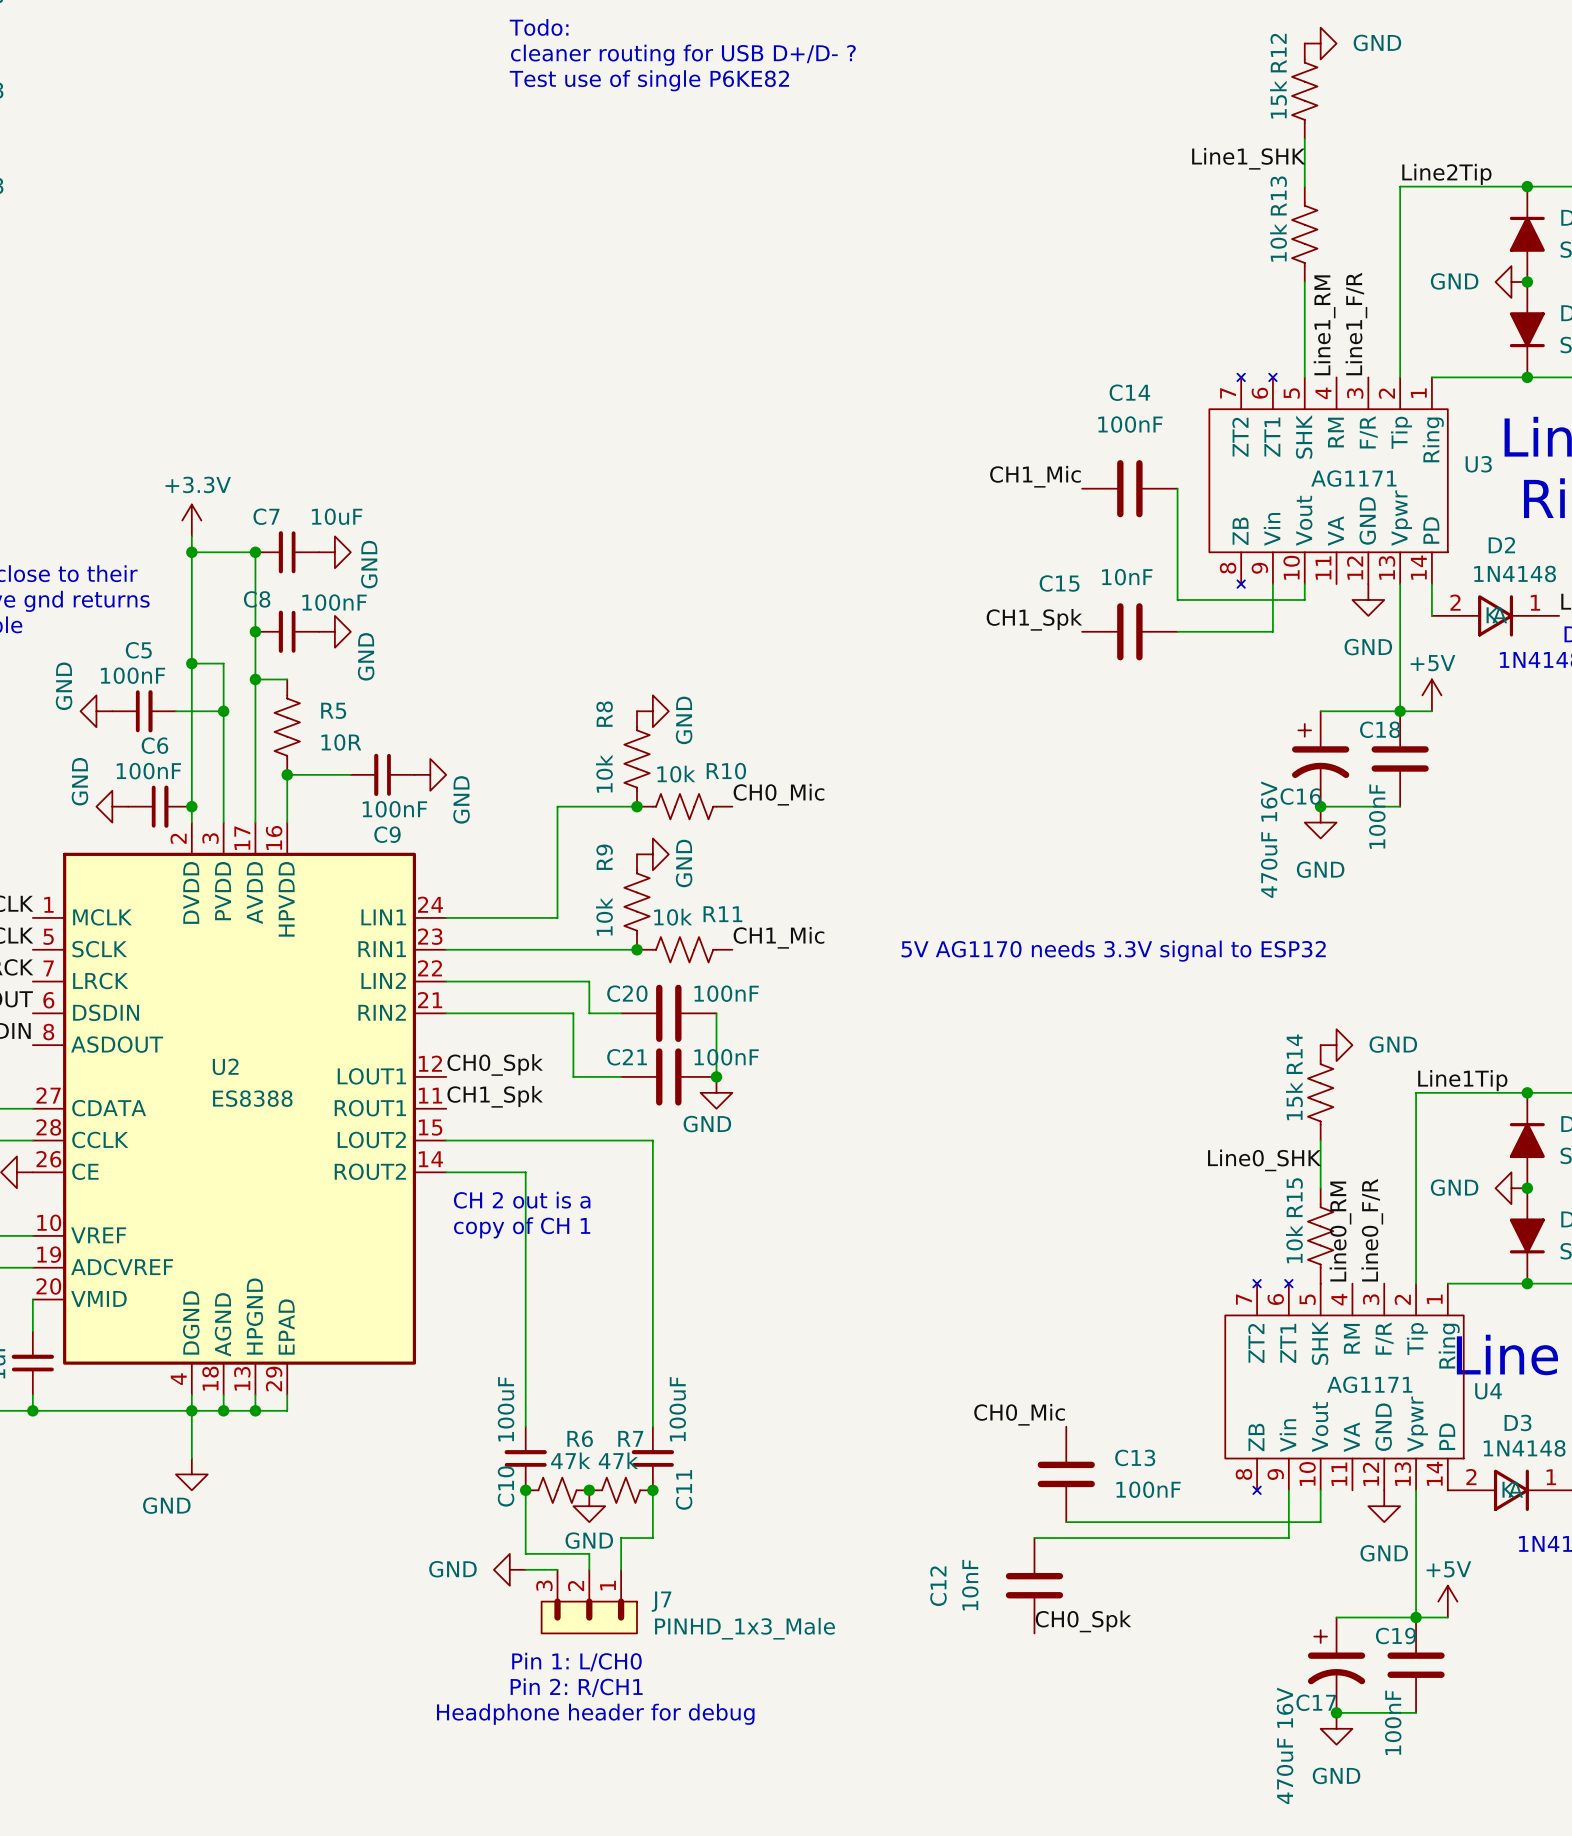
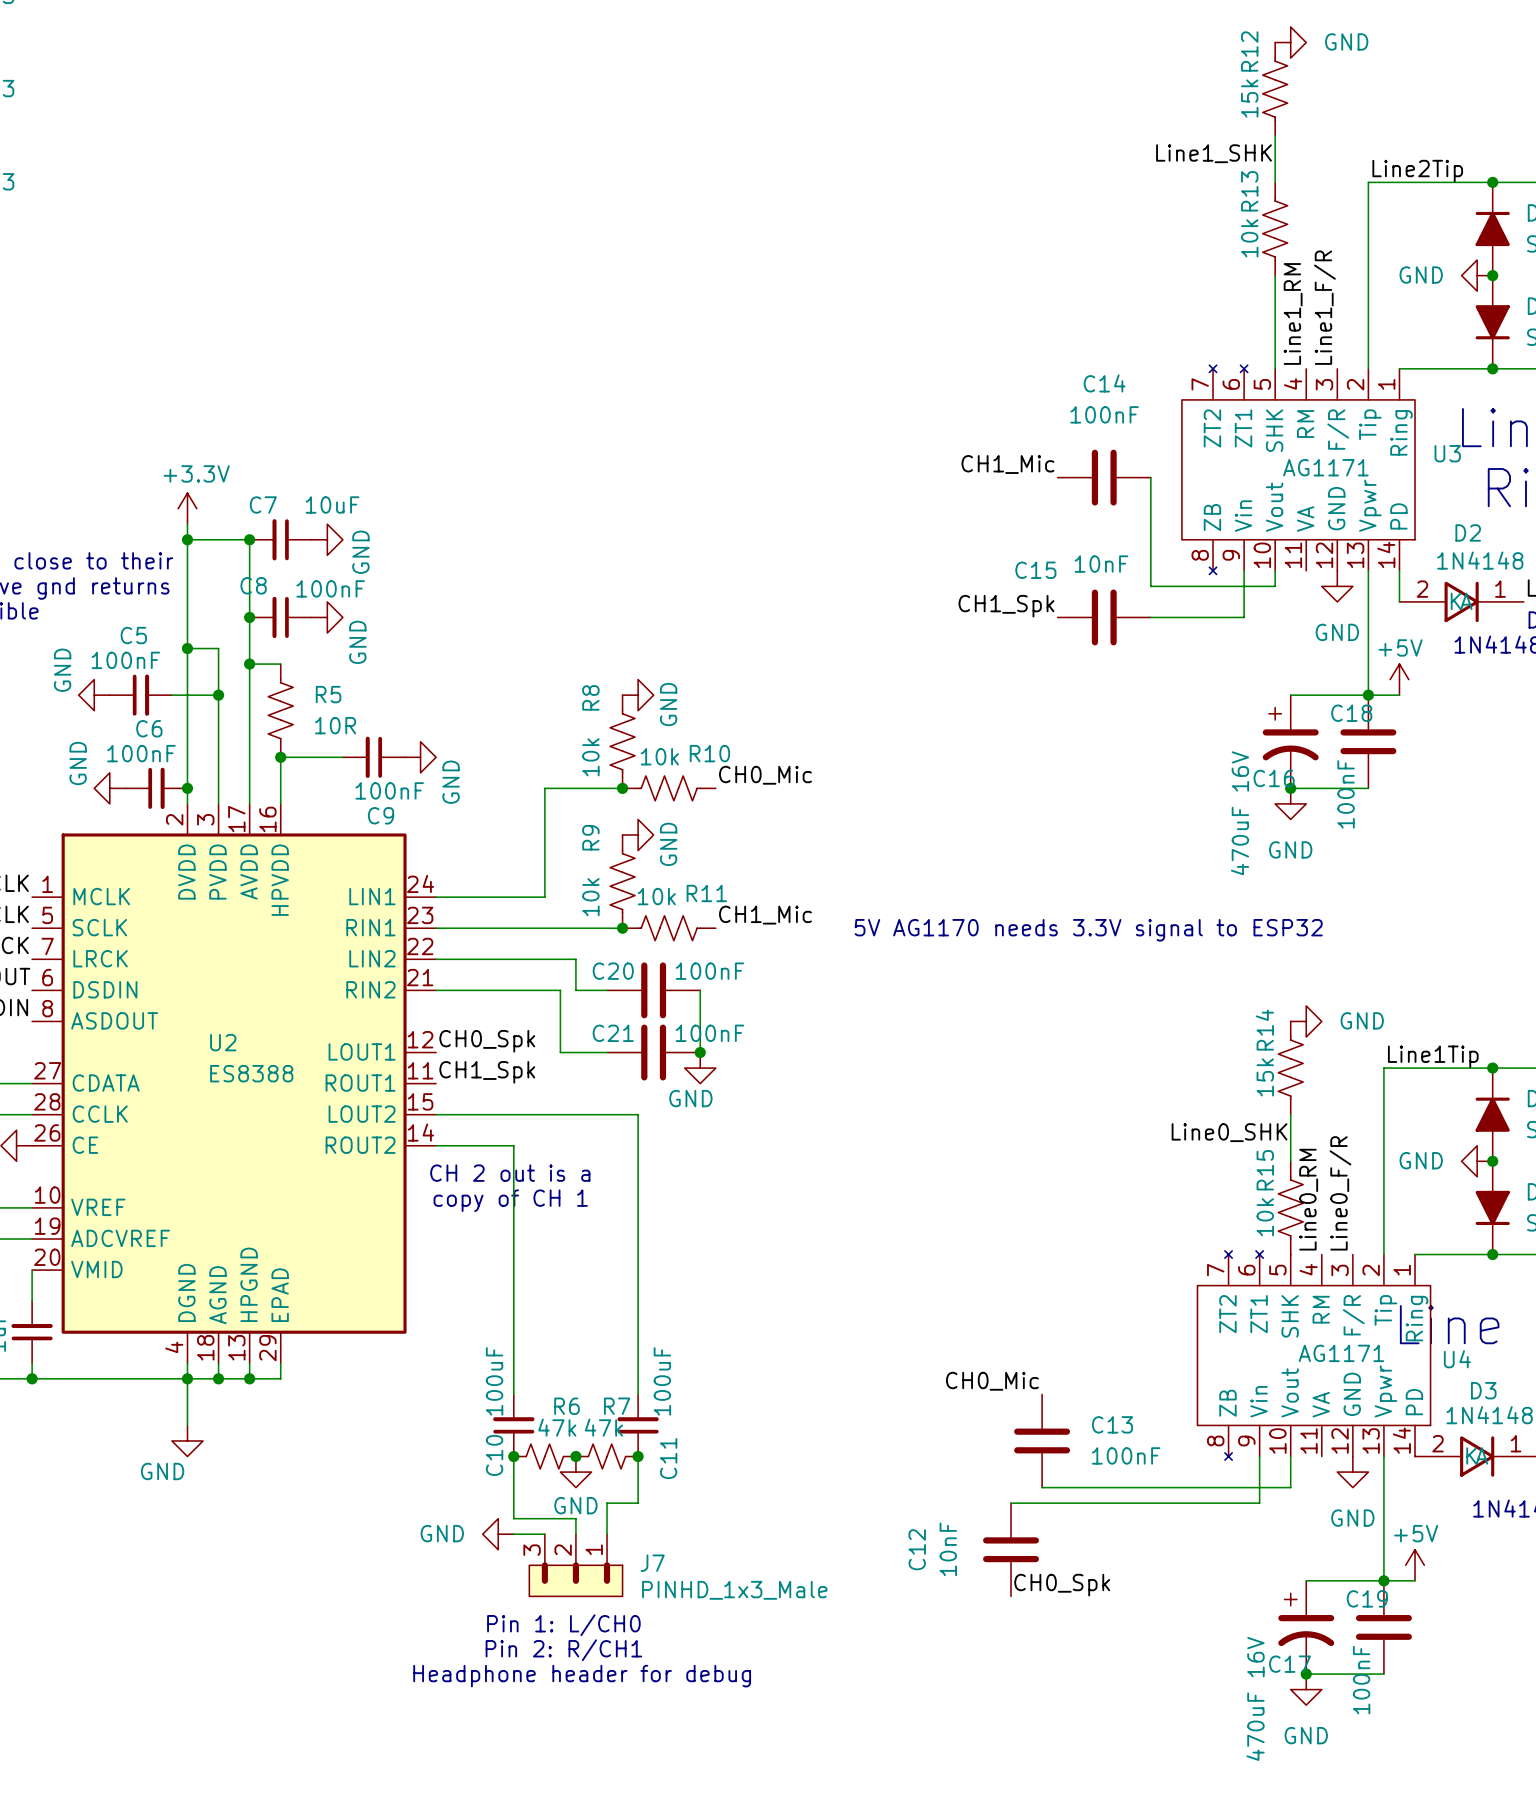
text: Todo: (539, 27) -> none
text: cleaner routing for USB D+/D- ? (683, 55) -> none
text: Test use of single P6KE82 (649, 80) -> none

